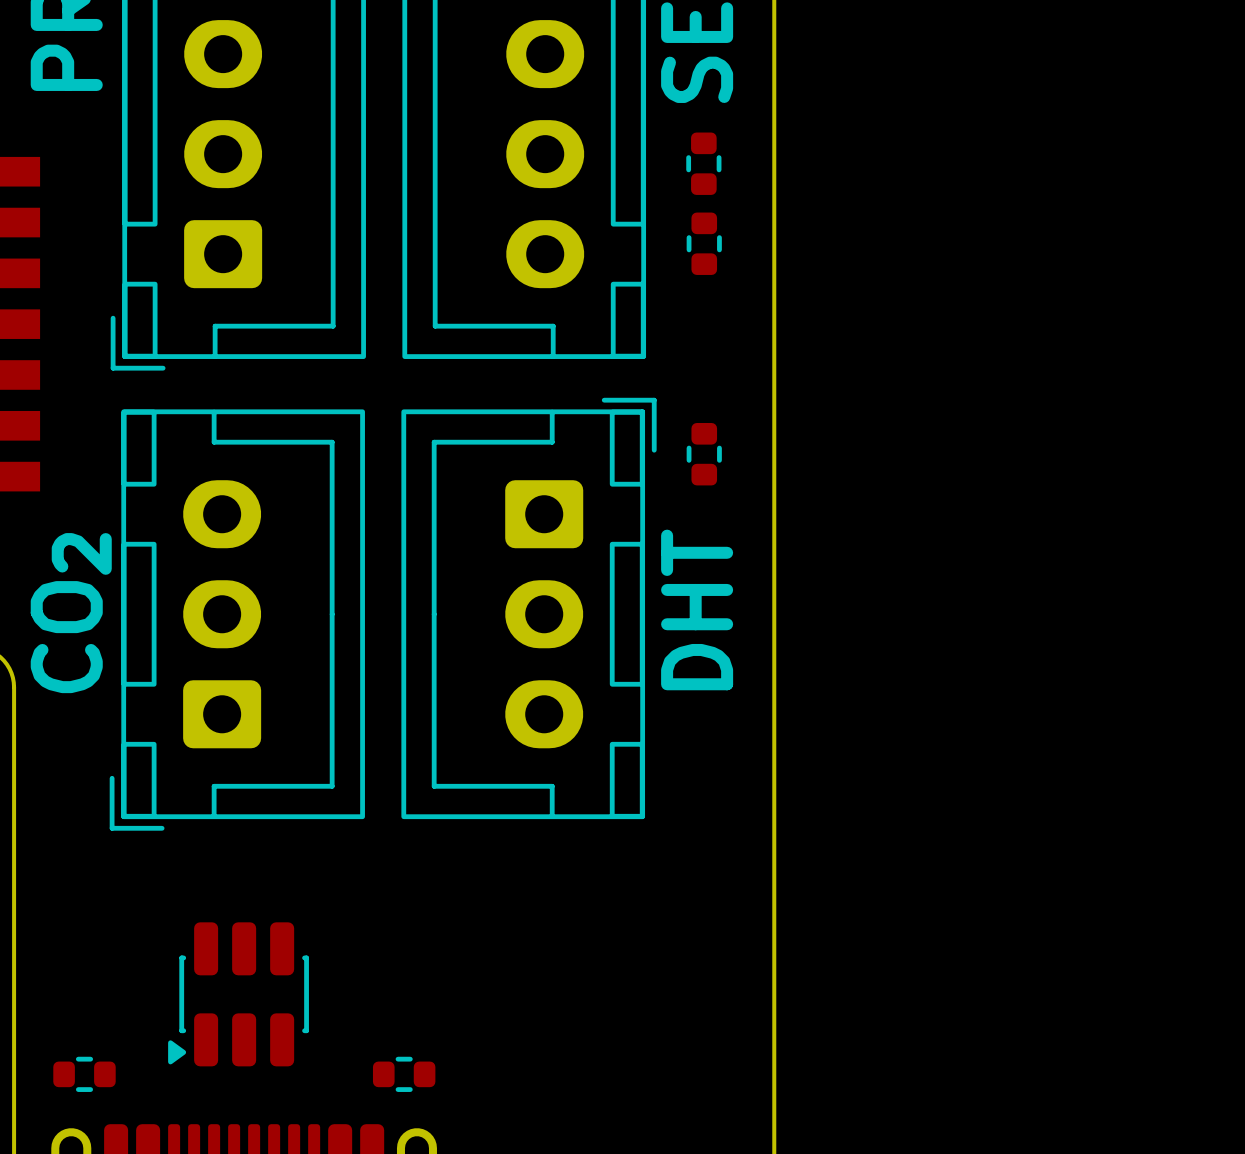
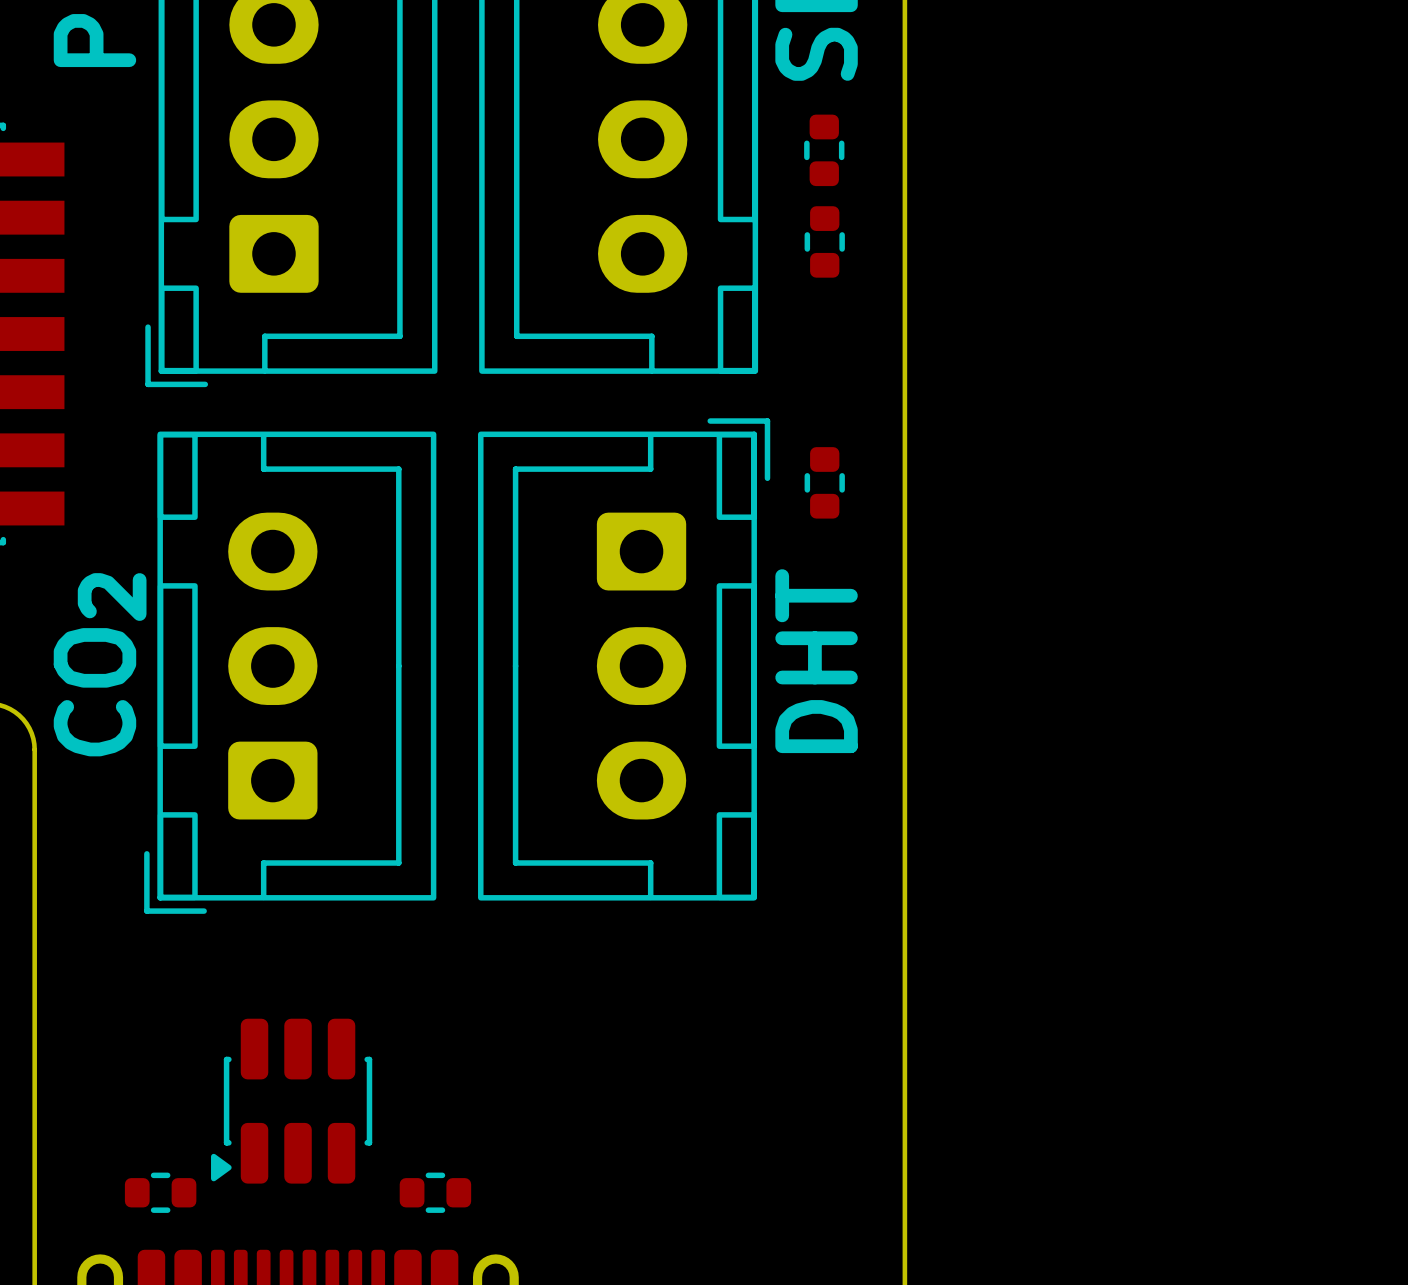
part position: (84, 1074) -> (160, 1192)
part position: (404, 1074) -> (435, 1192)

